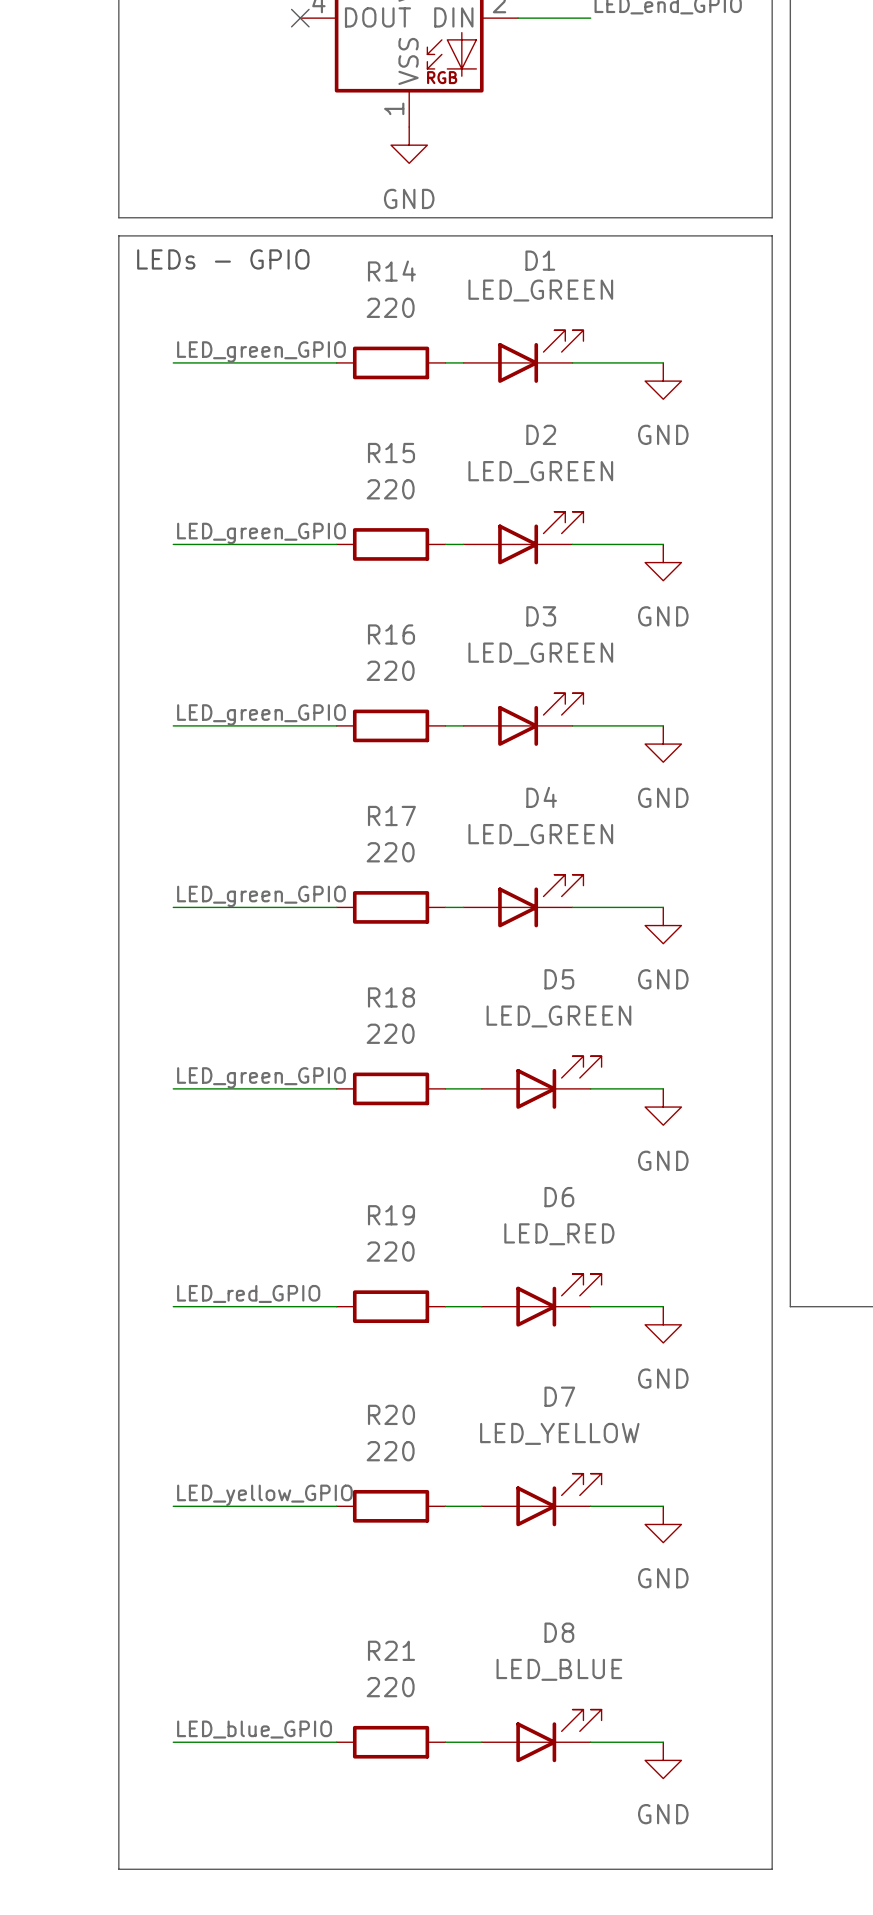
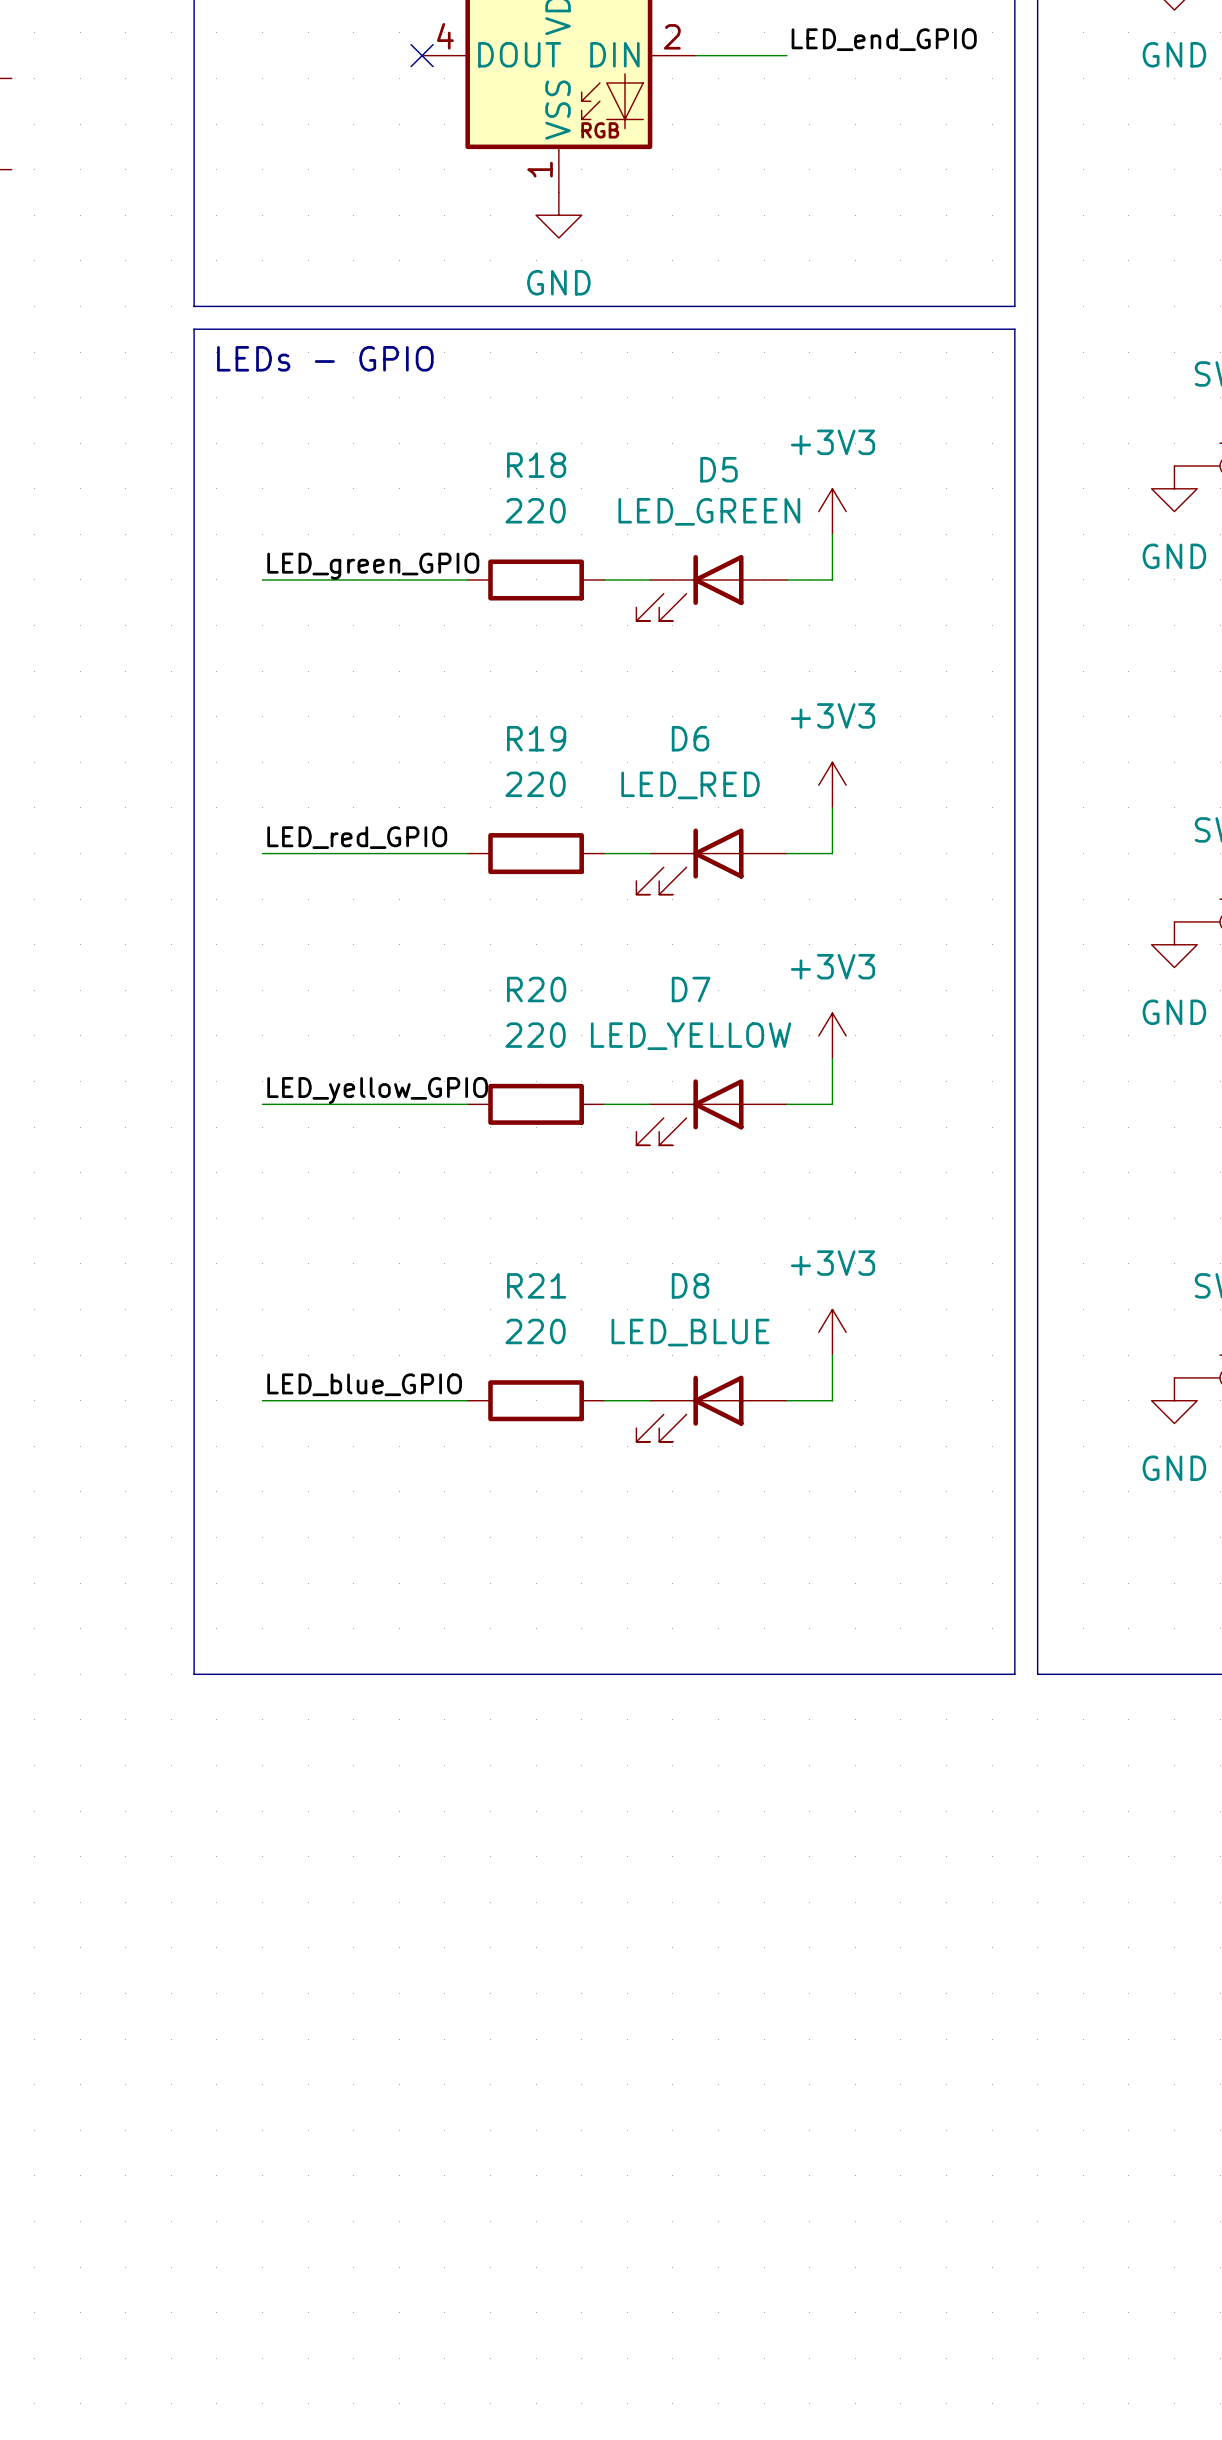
label: LED_green_GPIO (261, 351) -> none
D1: LED_GREEN (523, 356) -> none
wire: (173, 362) (336, 362) -> (262, 579) (467, 579)
R14: 220 (391, 362) -> none
wire: (445, 362) (463, 362) -> none
wire: (572, 362) (663, 362) -> none
power symbol: none -> +3V3 (832, 511)
power symbol: GND (663, 381) -> none
wire: none -> (832, 534) (832, 579) (786, 579)
label: none -> LED_green_GPIO (373, 566)
R18: none -> 220 (536, 579)
wire: none -> (604, 579) (650, 579)
label: LED_green_GPIO (261, 533) -> none
D2: LED_GREEN (523, 538) -> none
wire: (173, 544) (336, 544) -> none
R15: 220 (391, 544) -> none
wire: (445, 544) (463, 544) -> none
wire: (572, 544) (663, 544) -> none
power symbol: GND (663, 562) -> none
power symbol: none -> +3V3 (832, 785)
wire: none -> (832, 807) (832, 853) (786, 853)
label: none -> LED_red_GPIO (357, 837)
wire: none -> (604, 853) (650, 853)
label: LED_green_GPIO (261, 714) -> none
D3: LED_GREEN (523, 719) -> none
wire: (173, 725) (336, 725) -> (262, 853) (467, 853)
R16: 220 (391, 725) -> none
wire: (445, 725) (463, 725) -> none
wire: (572, 725) (663, 725) -> none
power symbol: GND (663, 744) -> none
power symbol: none -> +3V3 (832, 1035)
wire: none -> (832, 1058) (832, 1104) (786, 1104)
label: none -> LED_yellow_GPIO (377, 1090)
wire: none -> (604, 1104) (650, 1104)
label: LED_green_GPIO (261, 896) -> none
D4: LED_GREEN (523, 901) -> none
wire: (173, 907) (336, 907) -> (262, 1104) (467, 1104)
R17: 220 (391, 907) -> none
wire: (445, 907) (463, 907) -> none
wire: (572, 907) (663, 907) -> none
power symbol: GND (663, 925) -> none
R18 name: R18 (391, 997) -> R21 (536, 1285)
power symbol: none -> +3V3 (832, 1332)
label: LED_green_GPIO (261, 1077) -> LED_blue_GPIO (364, 1384)
D5 position: (541, 1082) -> (711, 587)
D5 rotation: 0° (558, 1082) -> 180° (689, 587)
wire: (626, 1088) (663, 1088) -> (832, 1400) (832, 1355)
power symbol: GND (663, 1107) -> none
D6 name position: D6 (559, 1197) -> D6 (690, 738)
D6 value position: LED_RED (559, 1234) -> LED_RED (690, 785)
label: LED_red_GPIO (248, 1293) -> none
D6 position: (541, 1300) -> (711, 861)
D6 rotation: 0° (558, 1300) -> 180° (689, 861)
line: (118, 1306) (118, 1869) (772, 1869) (772, 1306) -> (194, 1674) (1014, 1674)
R19 position: (391, 1306) -> (536, 853)
power symbol: GND (663, 1324) -> none
D7 name position: D7 (559, 1396) -> D7 (691, 989)
D7 value position: LED_YELLOW (559, 1433) -> LED_YELLOW (691, 1036)
label: LED_yellow_GPIO (264, 1495) -> none
D7 position: (541, 1499) -> (711, 1112)
D7 rotation: 0° (558, 1499) -> 180° (689, 1112)
wire: (173, 1506) (336, 1506) -> none
R20 position: (391, 1506) -> (536, 1104)
wire: (445, 1506) (481, 1506) -> none
wire: (590, 1506) (663, 1506) -> none
power symbol: GND (663, 1524) -> none
D8 name position: D8 (559, 1632) -> D8 (690, 1285)
D8 value position: LED_BLUE (559, 1669) -> LED_BLUE (690, 1332)
label: LED_blue_GPIO (254, 1729) -> none
D8 position: (541, 1735) -> (711, 1408)
D8 rotation: 0° (558, 1735) -> 180° (689, 1408)
wire: (173, 1742) (336, 1742) -> none
R21: 220 (391, 1742) -> none
wire: (445, 1742) (481, 1742) -> none
wire: (590, 1742) (663, 1742) -> none
power symbol: GND (663, 1760) -> none

